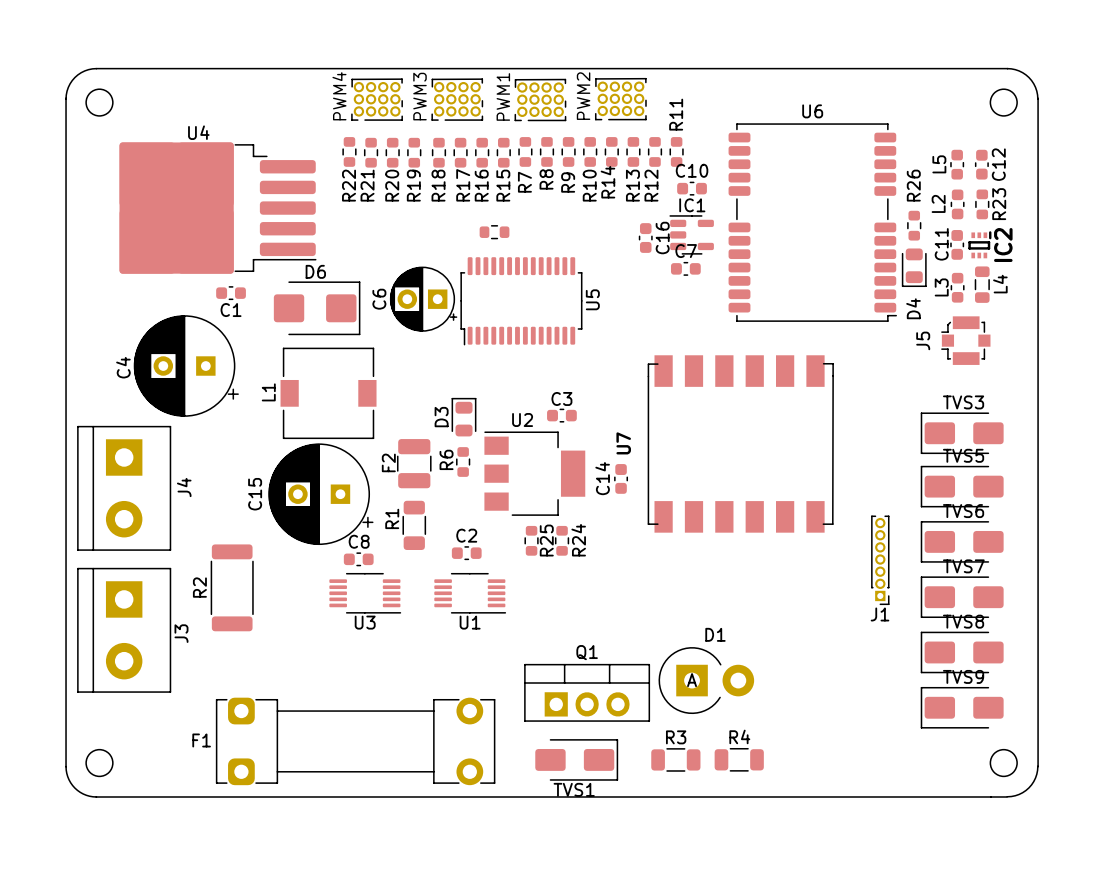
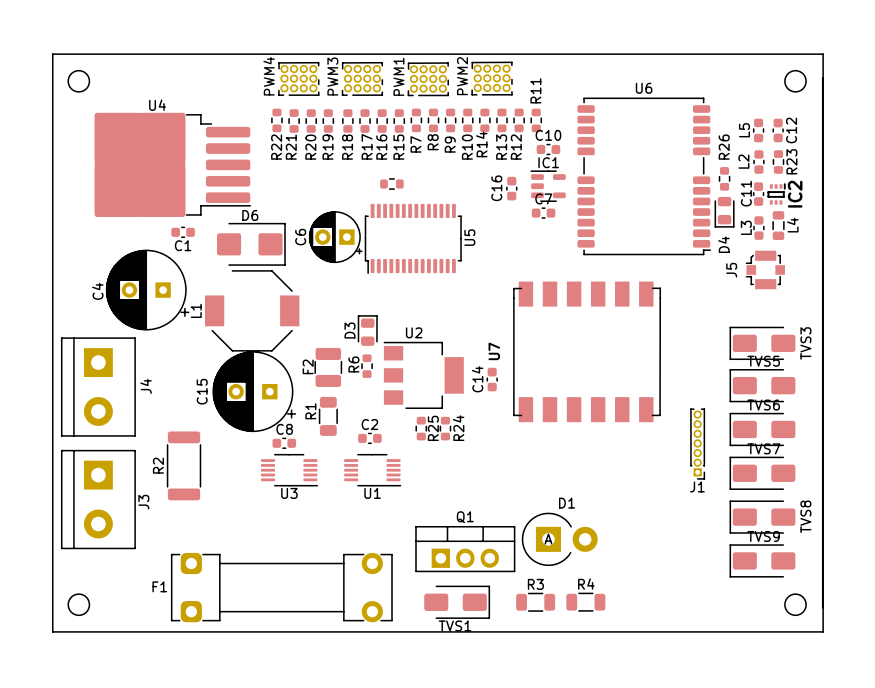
board edge: none -> (52, 54) (823, 54) (823, 631) (52, 631) (52, 54)
board edge: (1007, 68) (1019, 70) (1028, 77) (1035, 87) (1037, 99) -> none
board edge: (1007, 68) (96, 68) (84, 70) (74, 77) (68, 87) (66, 99) -> none
board edge: (66, 98) (66, 766) (69, 779) (77, 790) (86, 795) (96, 797) (1006, 797) -> none
C16 name position: C16 (662, 238) -> C16 (496, 188)
L1 footprint: [280, 347, 377, 440] -> [204, 270, 300, 352]
TVS3 name rotation: 0° (963, 402) -> 90° counterclockwise (805, 343)
TVS3 name position: TVS3 (963, 402) -> TVS3 (805, 343)
C3: (561, 415) -> none
TVS8 name rotation: 0° (963, 621) -> 90° counterclockwise (805, 516)
TVS8 name position: TVS8 (963, 621) -> TVS8 (805, 516)
board edge: (1037, 766) (1035, 778) (1028, 787) (1019, 794) (1007, 796) -> none

